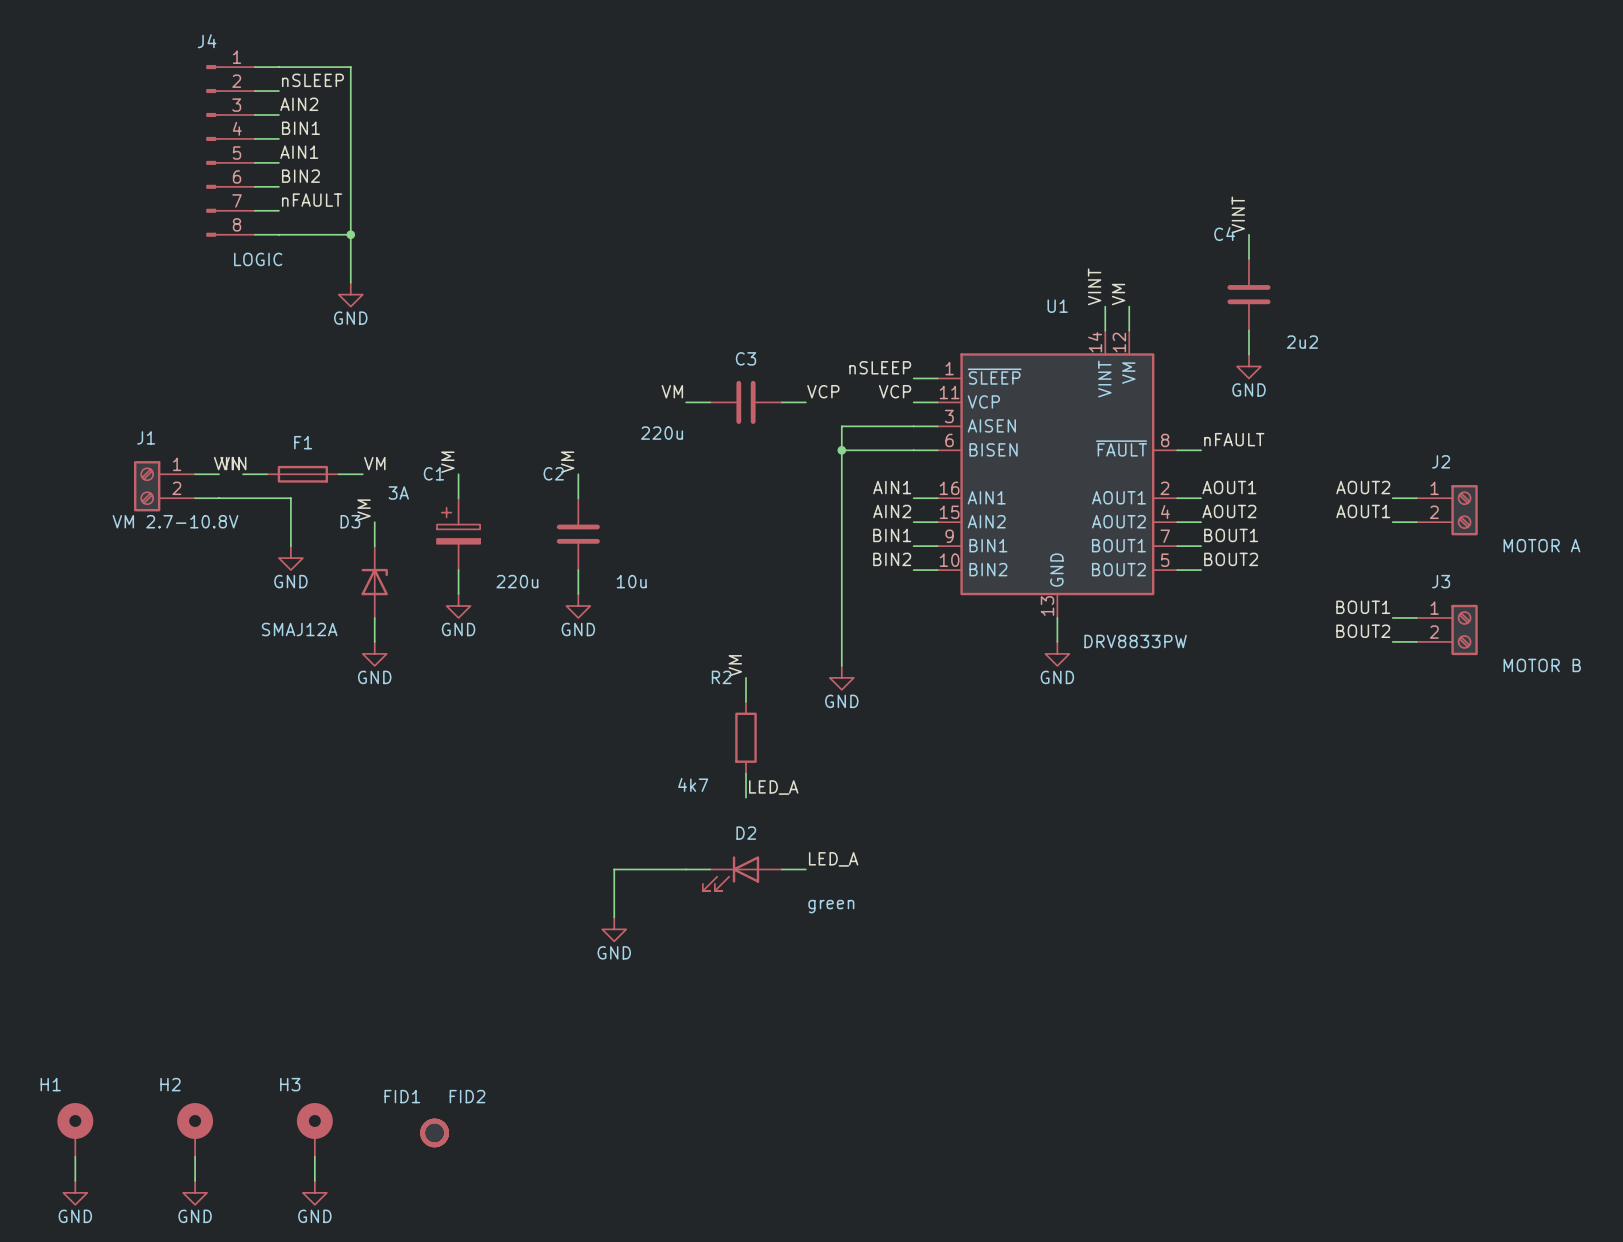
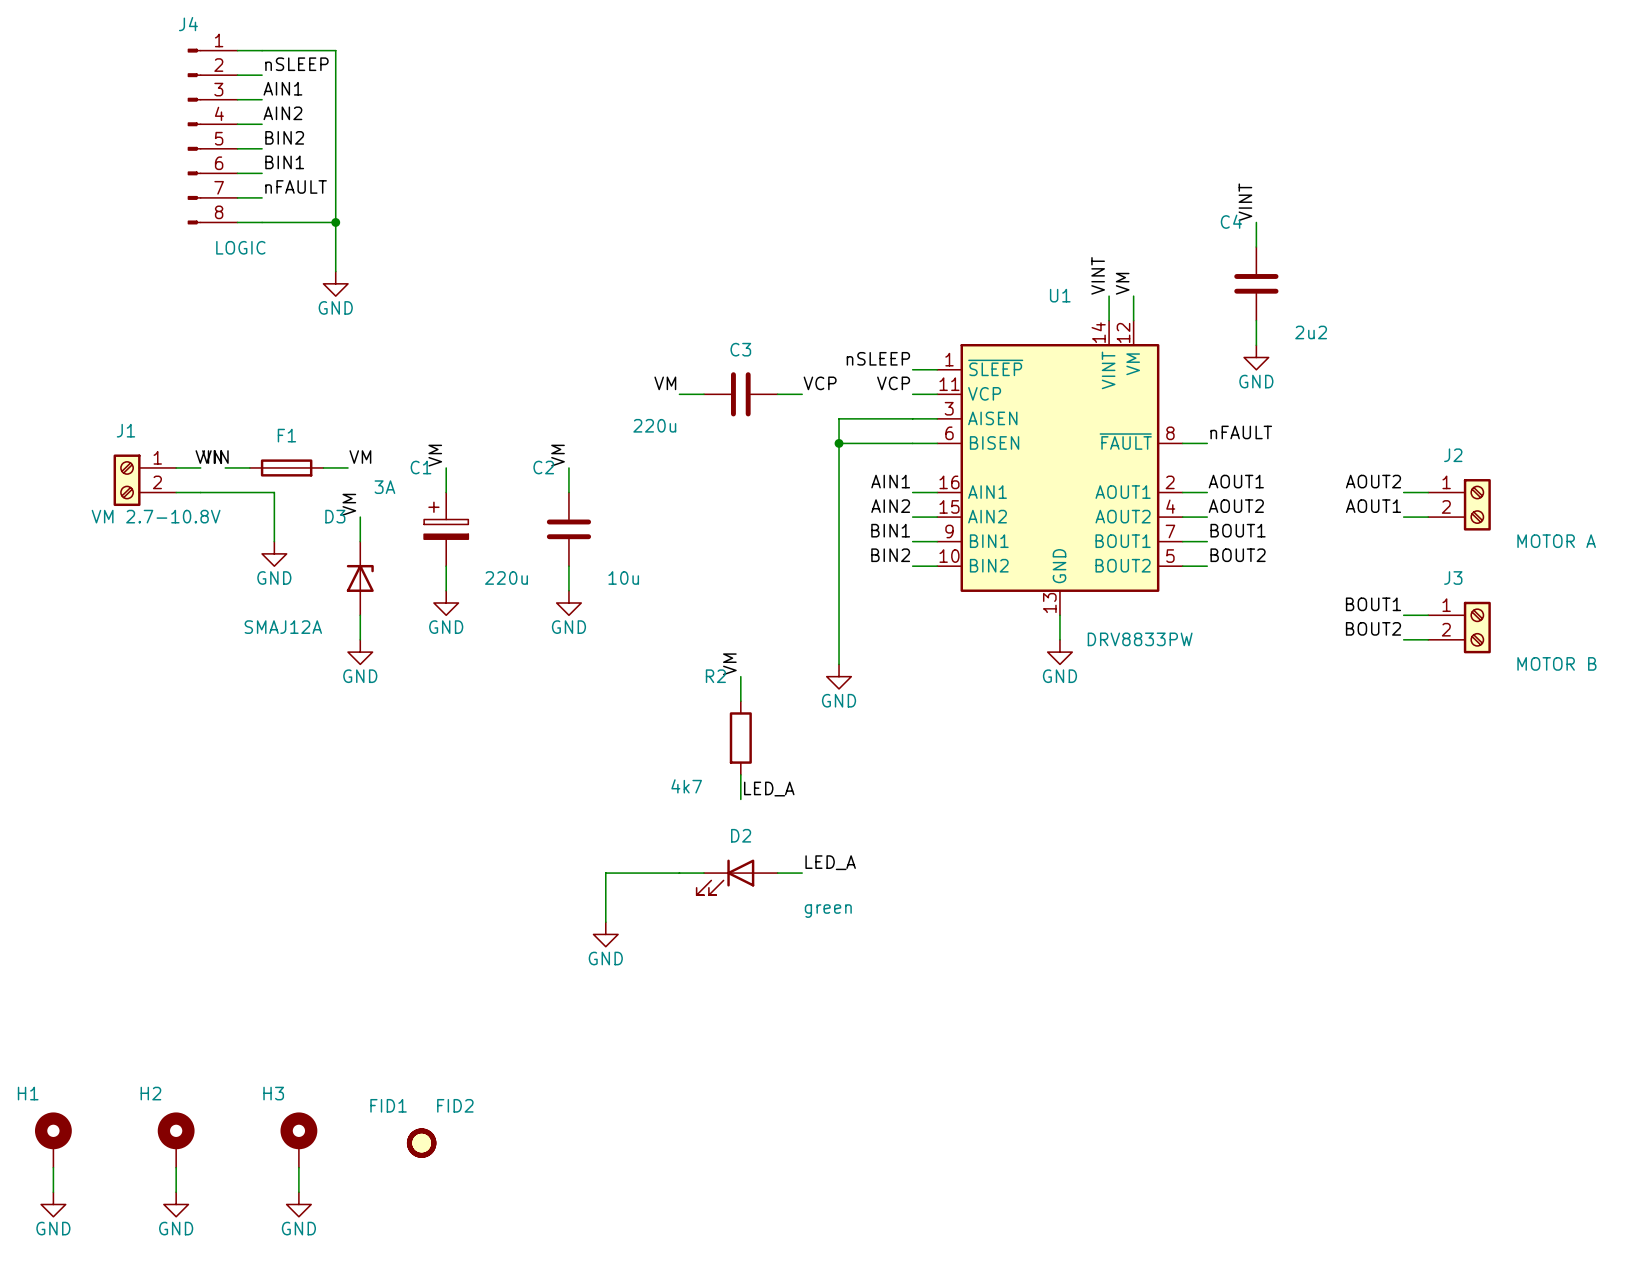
label: AIN2 (299, 104) -> AIN1 (282, 88)
label: BIN1 (300, 128) -> AIN2 (282, 113)
label: AIN1 (299, 152) -> BIN2 (284, 137)
label: BIN2 (300, 176) -> BIN1 (284, 162)

